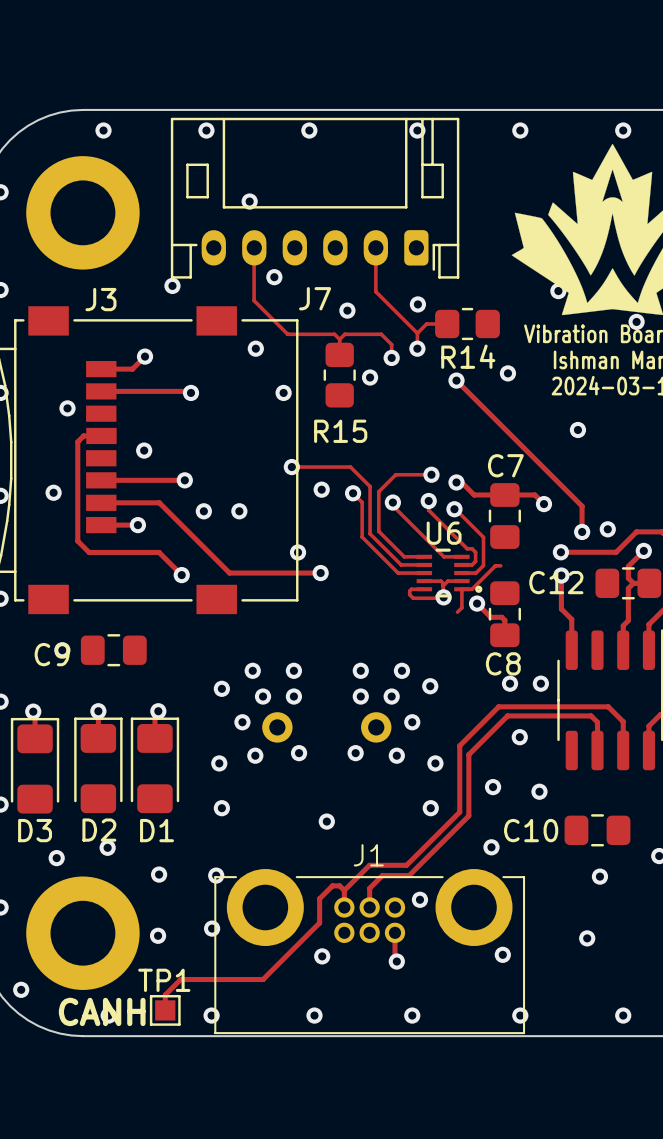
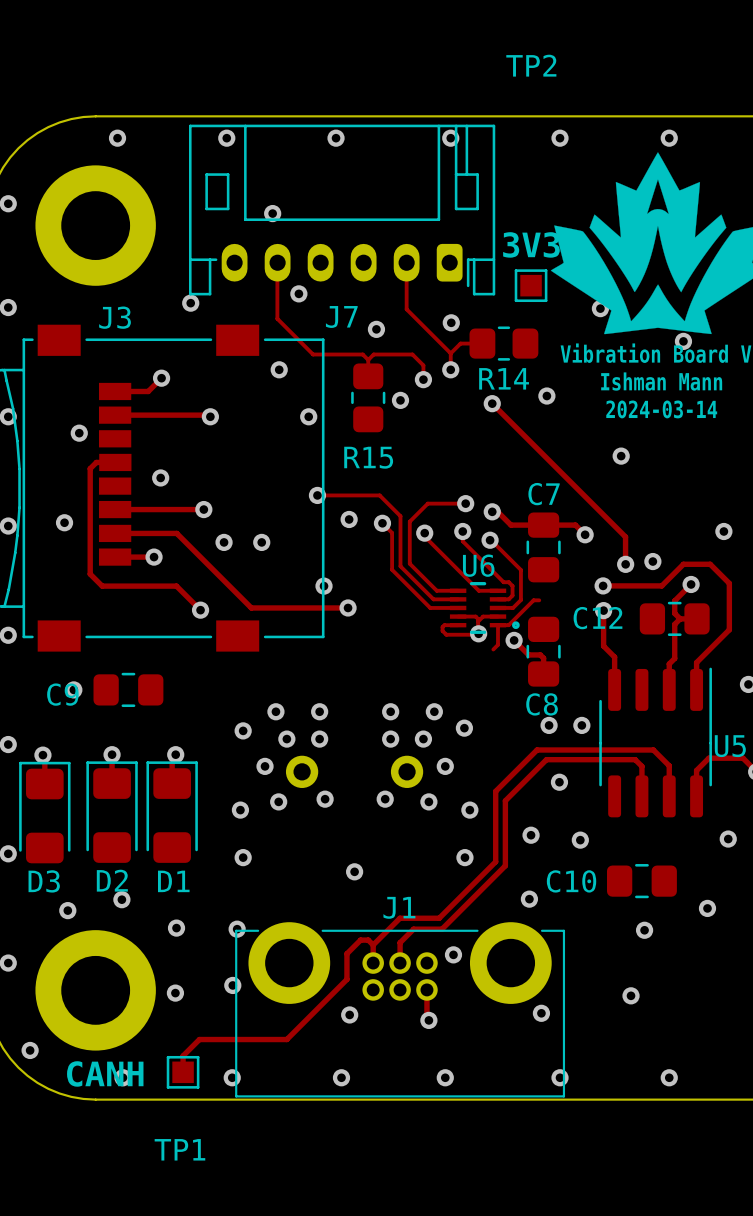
text: none -> 3V3 (531, 244)
TP2: none -> (531, 285)
TP1 name position: TP1 (164, 980) -> TP1 (179, 1149)

